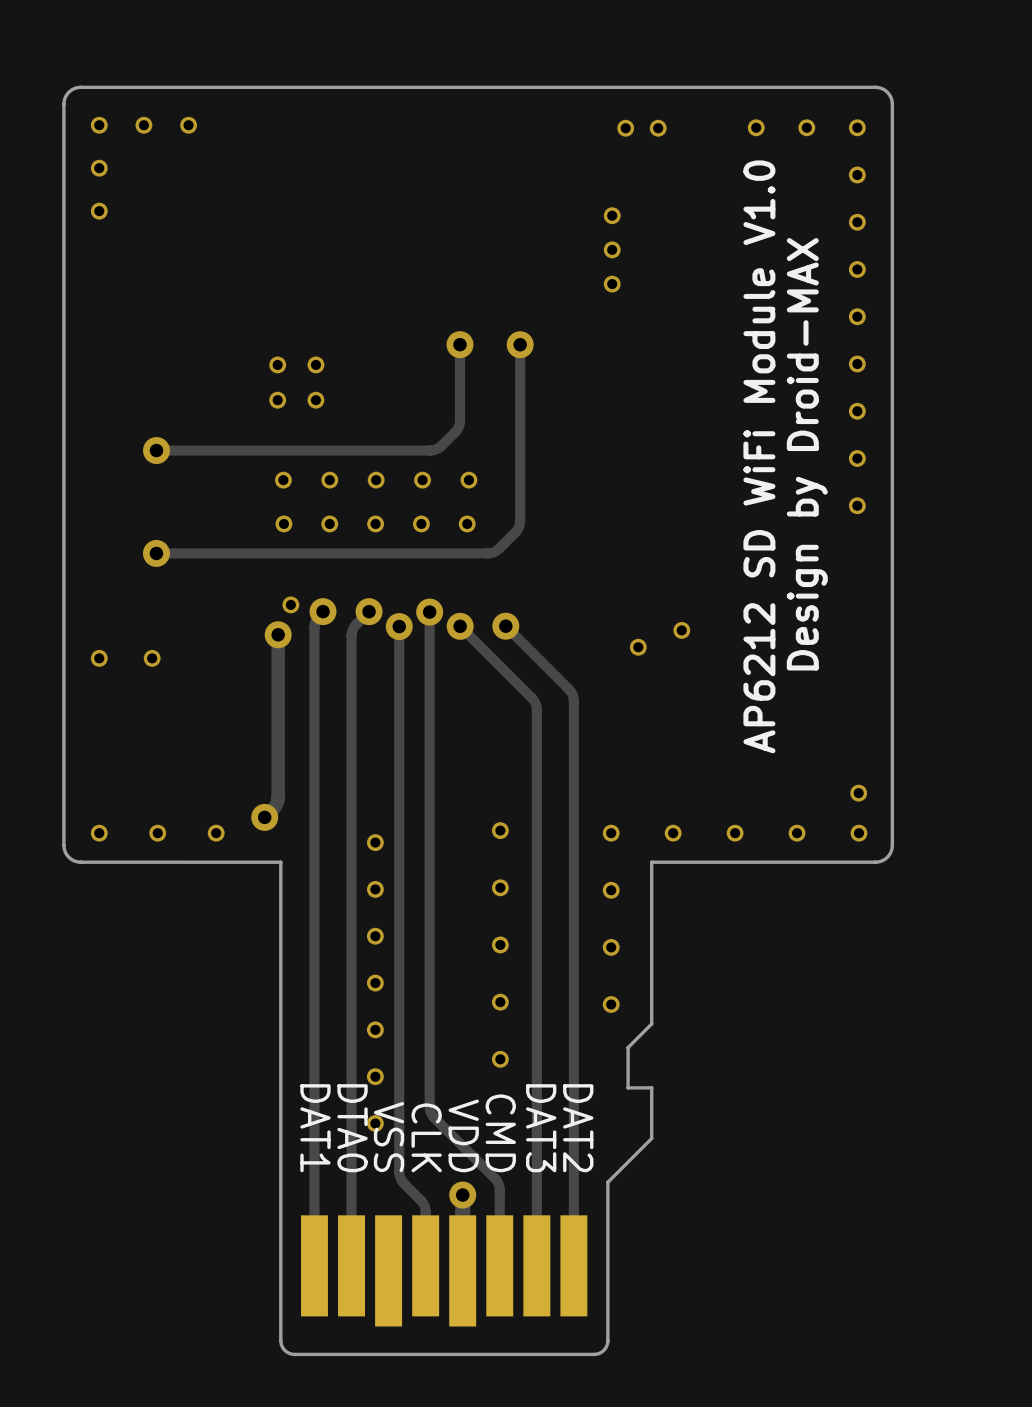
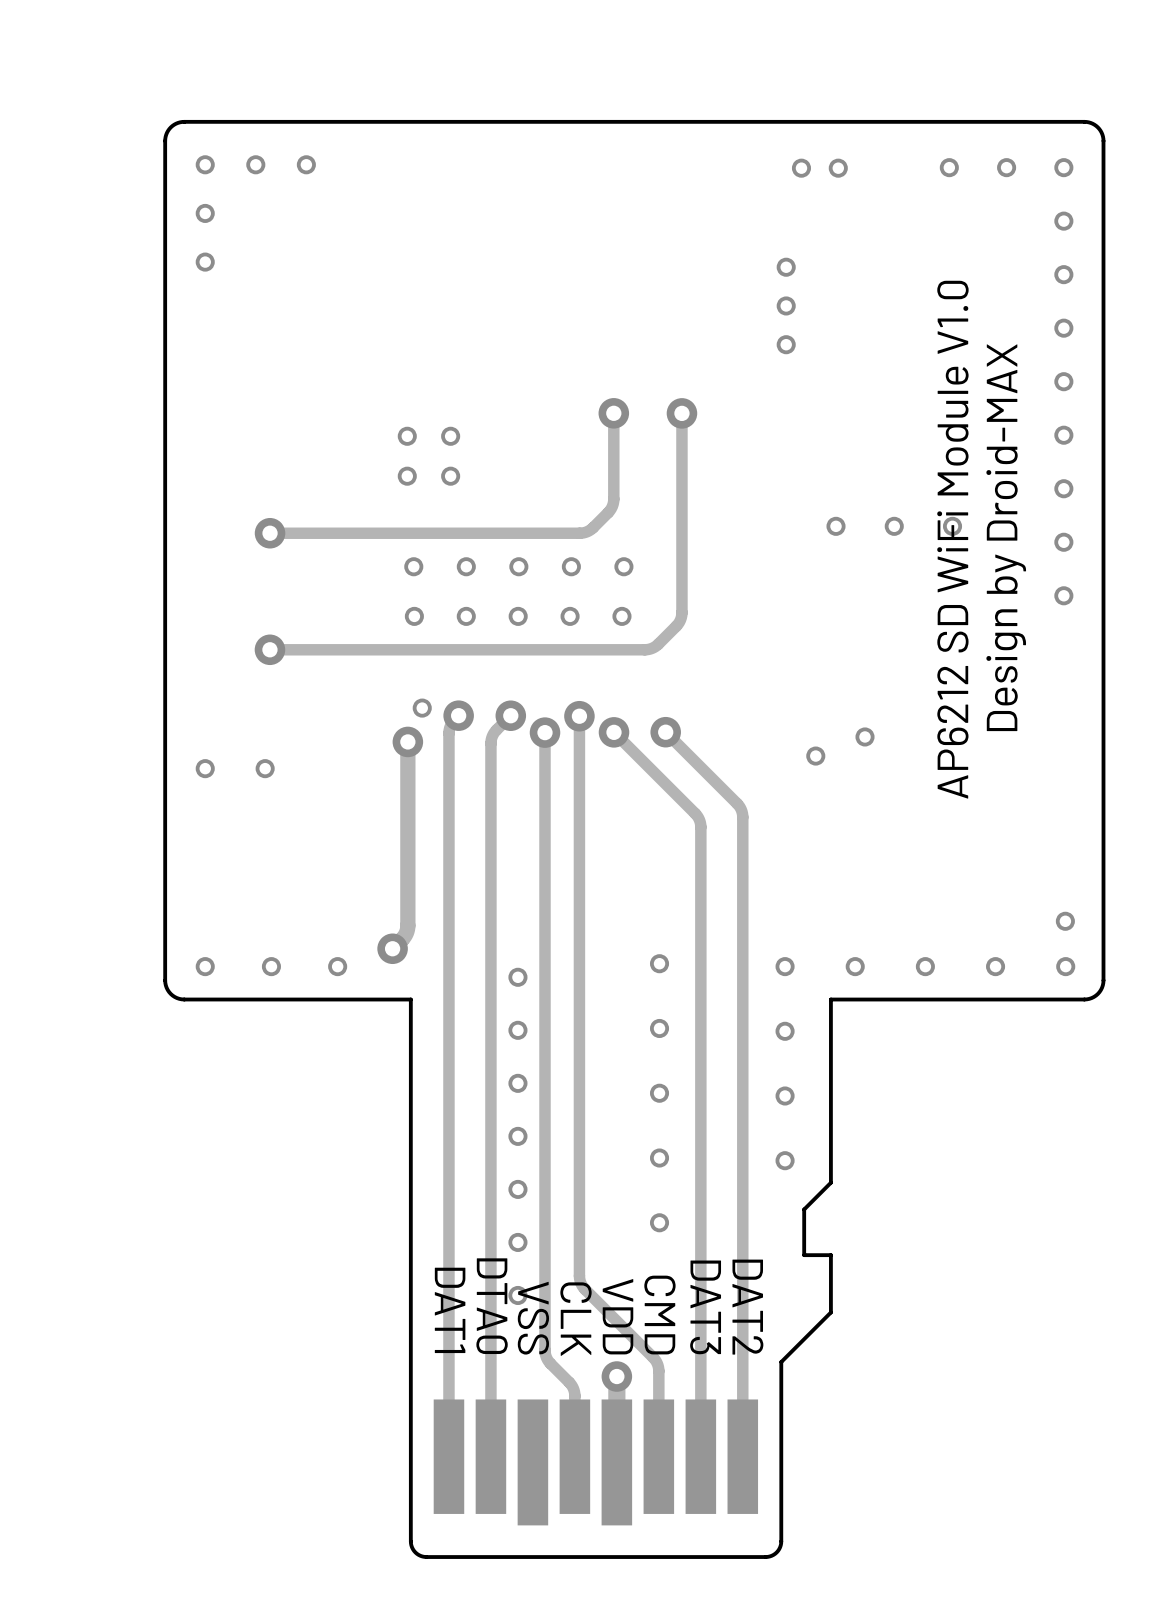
via: none -> (836, 526)
via: none -> (894, 526)
via: none -> (952, 526)

